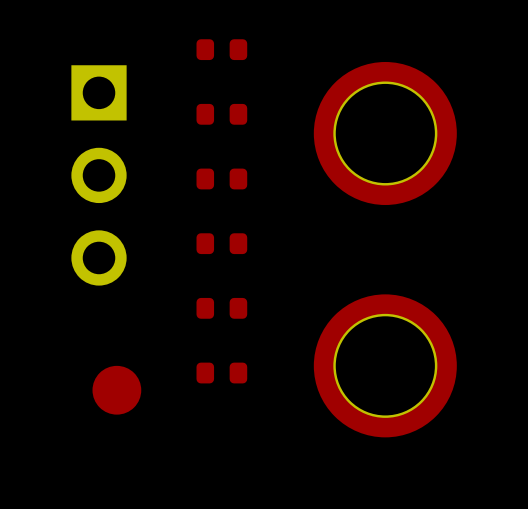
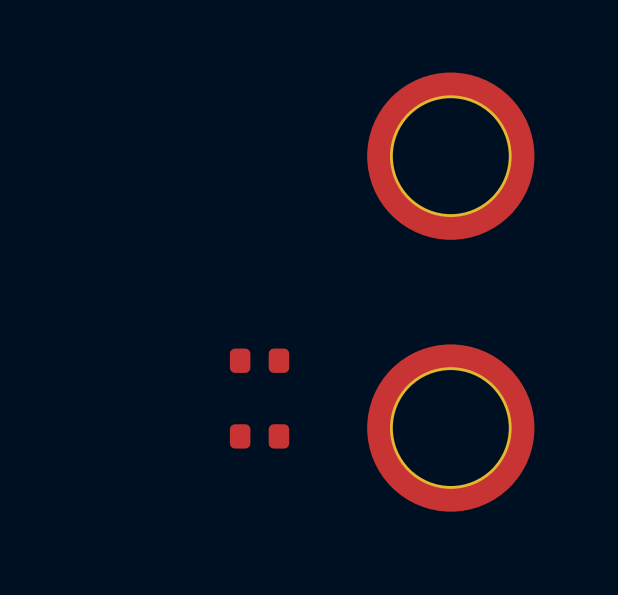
part: (221, 49) -> none
part: (221, 114) -> none
part: (99, 175) -> none
part: (221, 178) -> none
part: (221, 243) -> none
part: (116, 390) -> none

